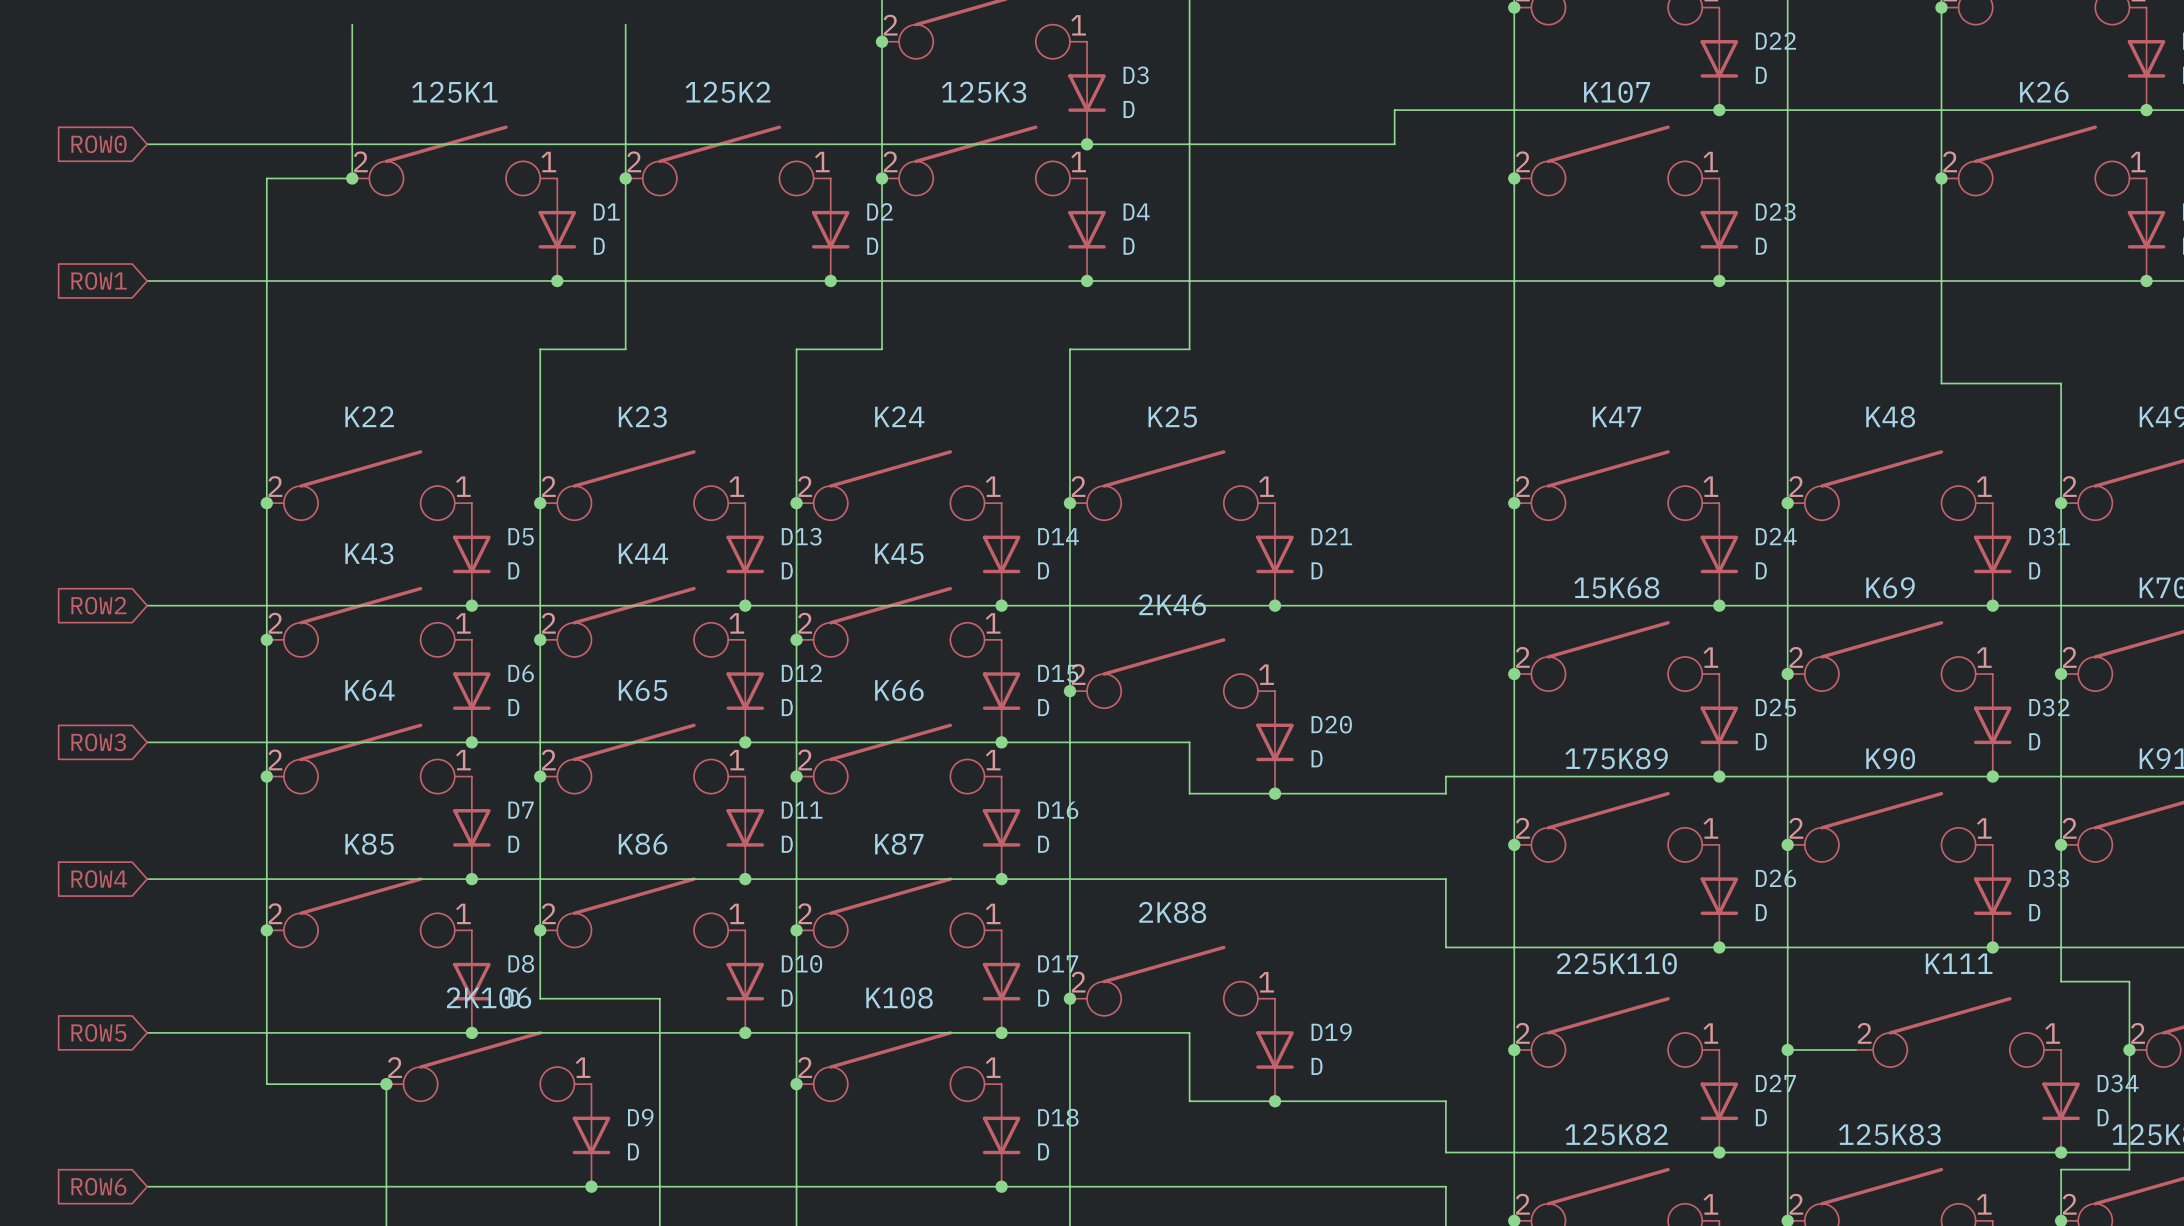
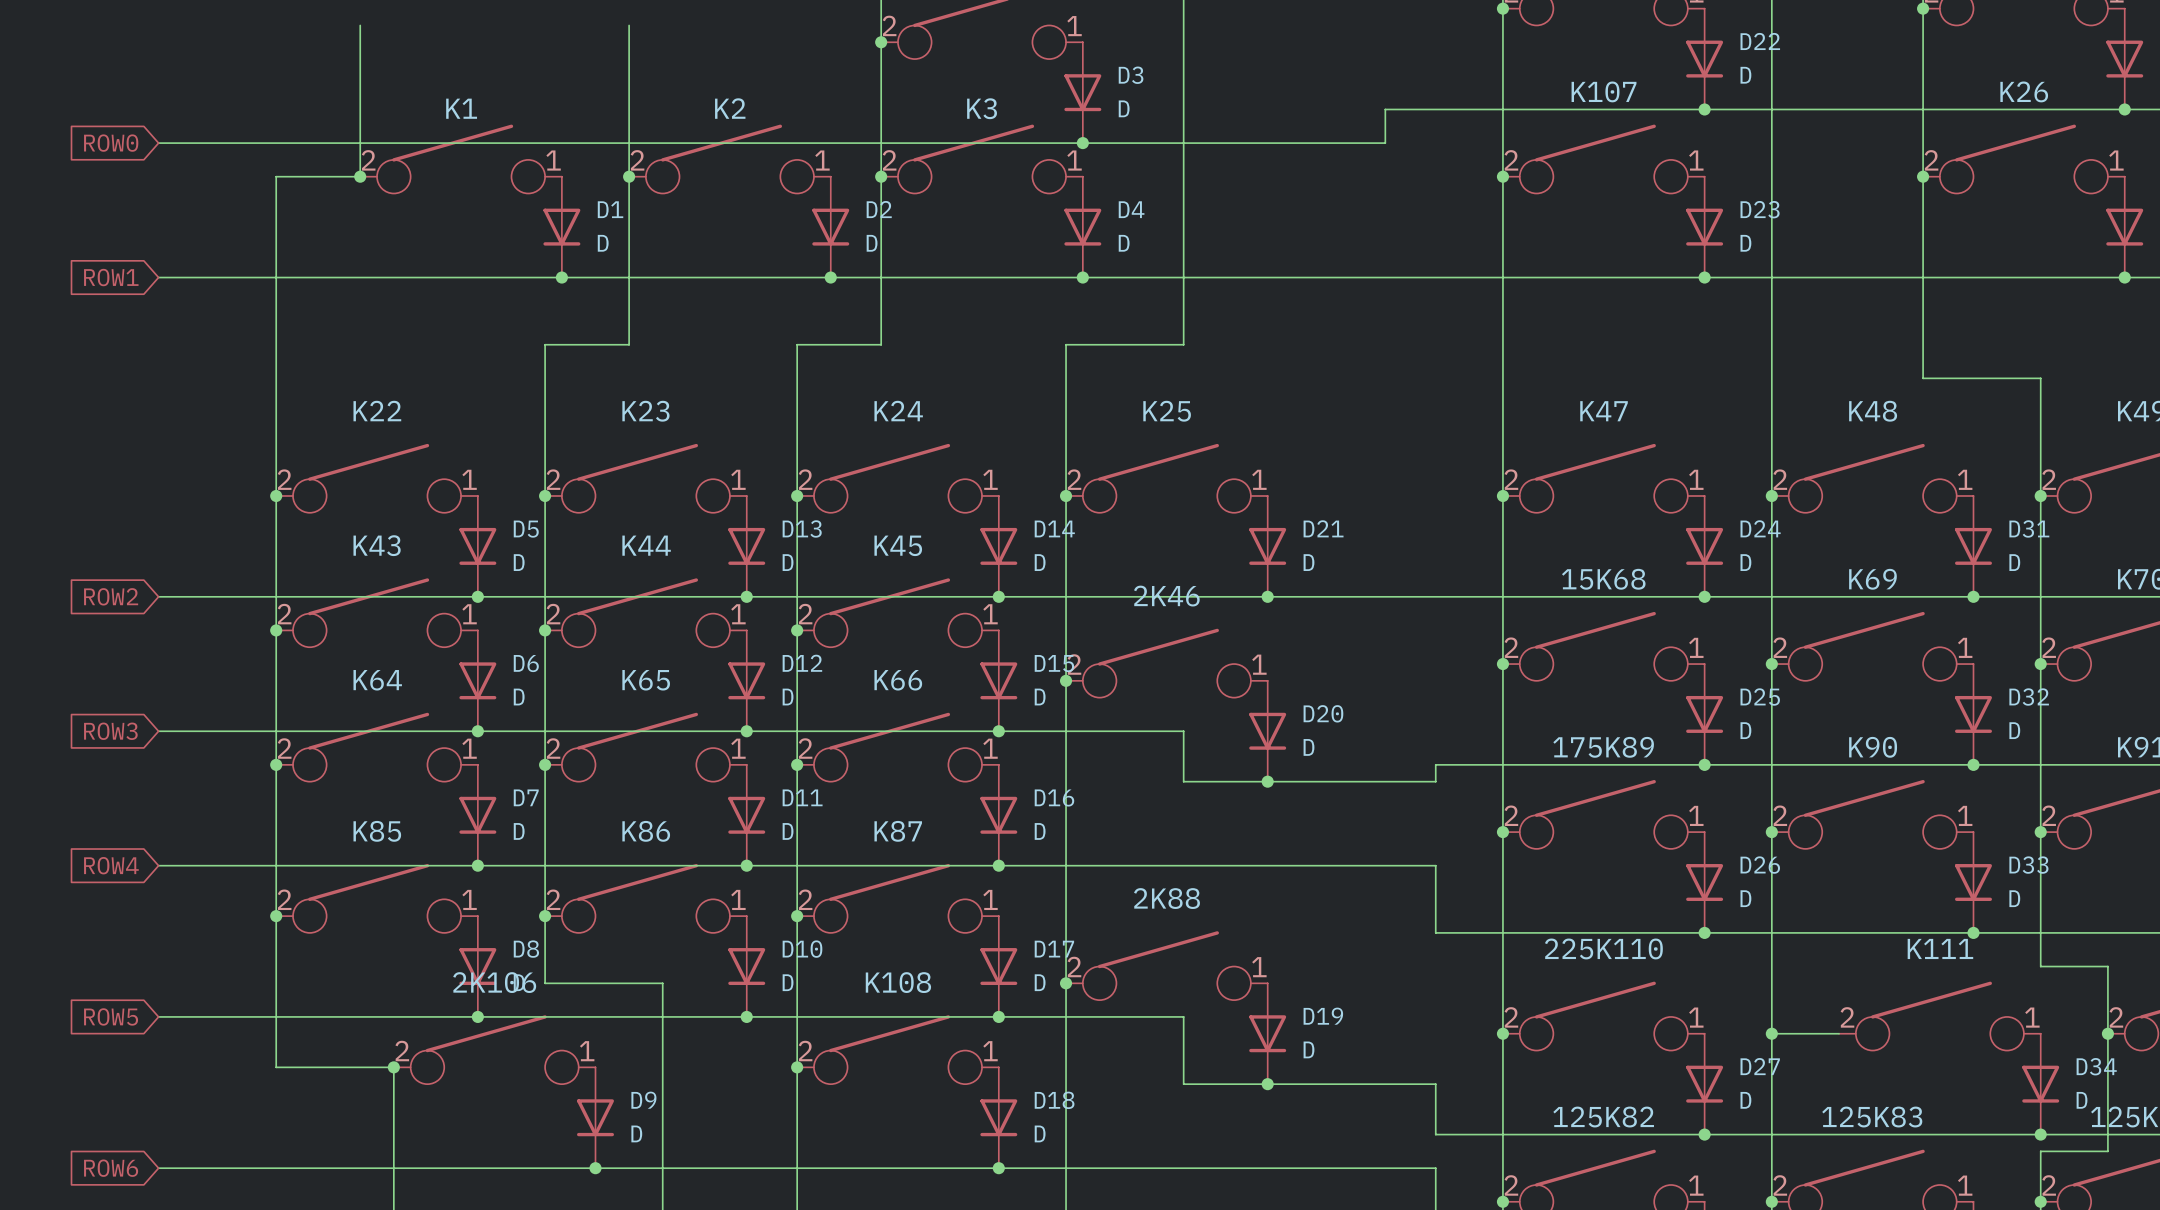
125K1 name: 125K1 (454, 92) -> K1 (461, 108)
125K2 name: 125K2 (728, 92) -> K2 (730, 108)
125K3 name: 125K3 (984, 92) -> K3 (982, 108)

